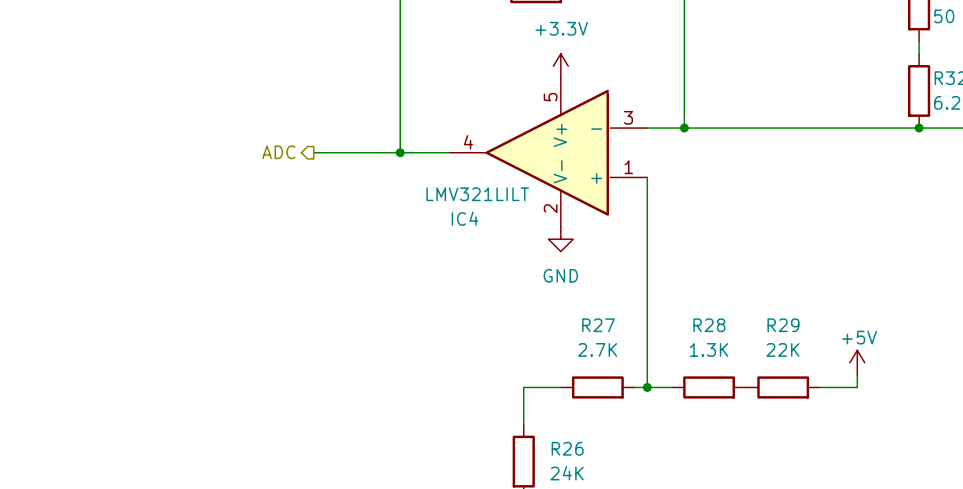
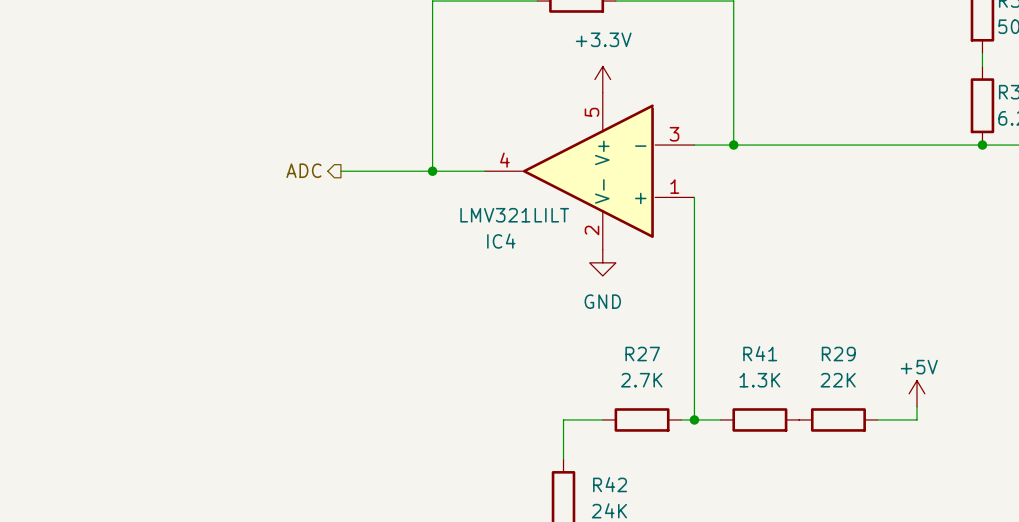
R28 name: R28 (709, 325) -> R41 (760, 353)
R26 name: R26 (567, 448) -> R42 (610, 484)

